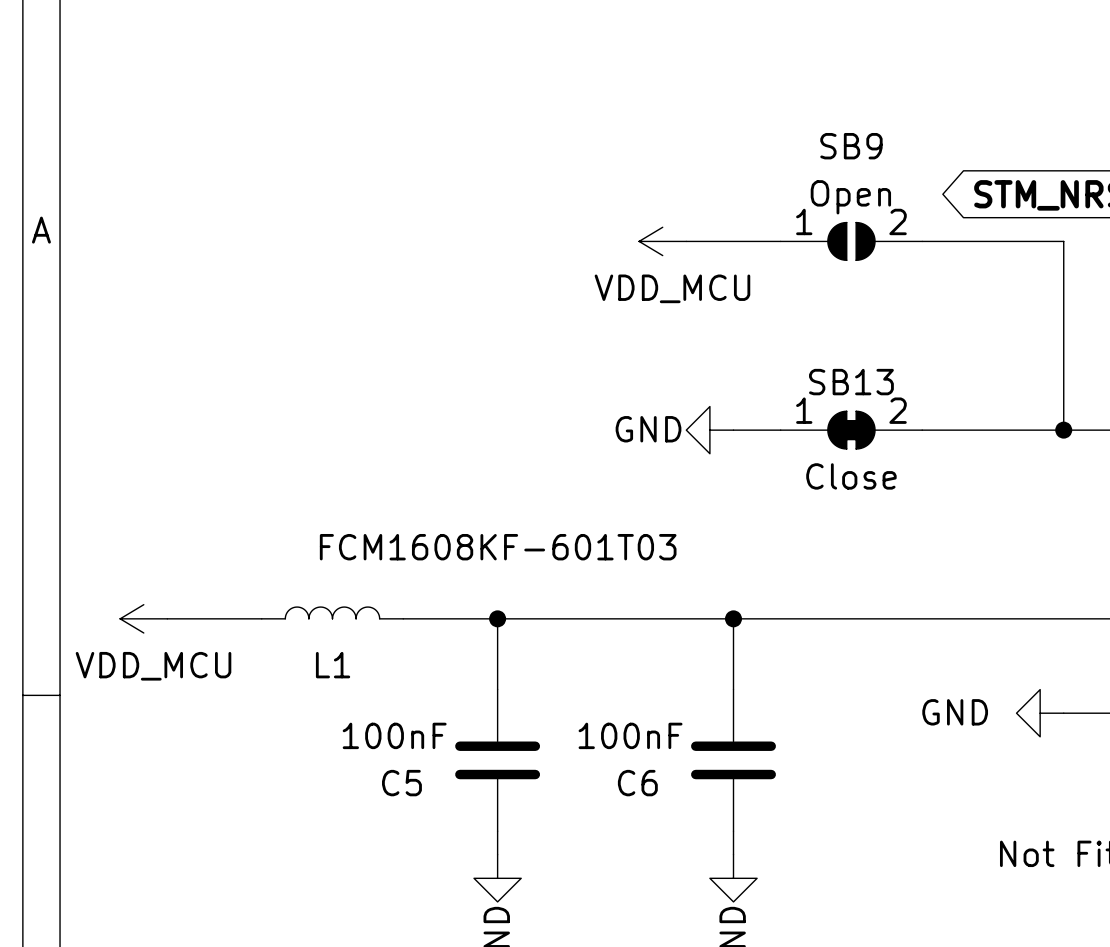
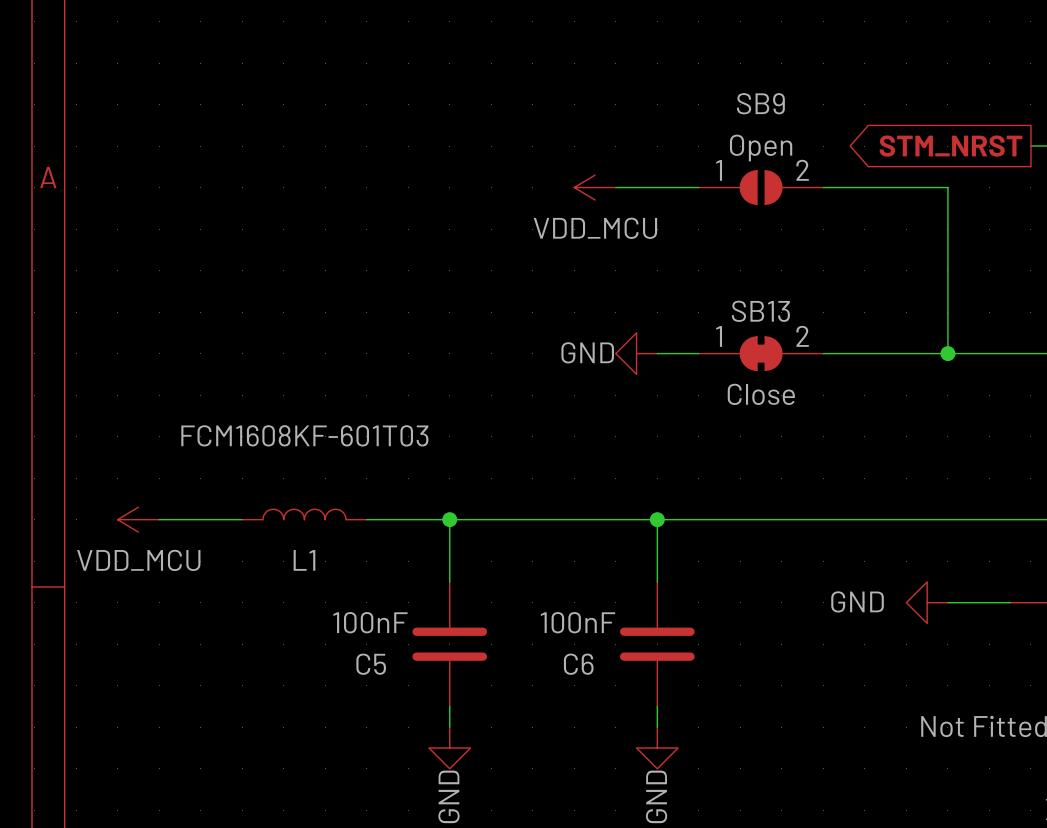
L1 value position: FCM1608KF-601T03 (498, 547) -> FCM1608KF-601T03 (304, 435)

